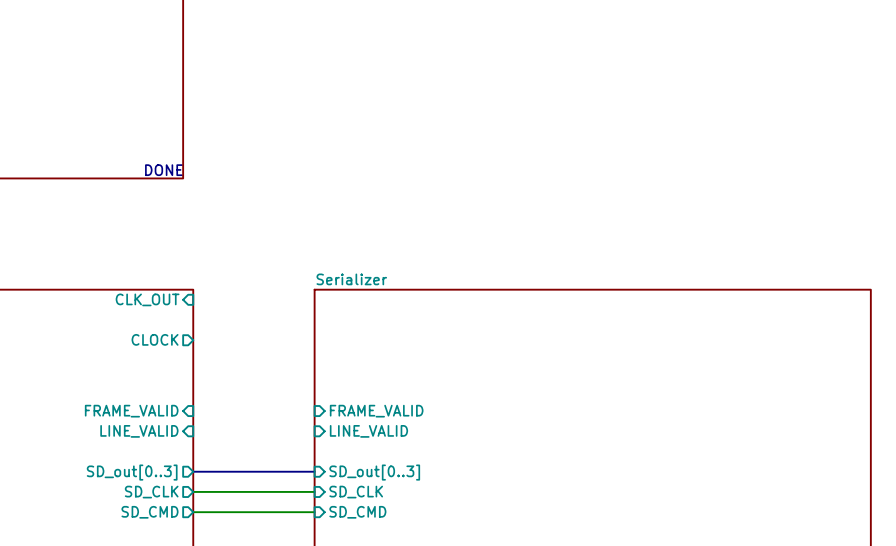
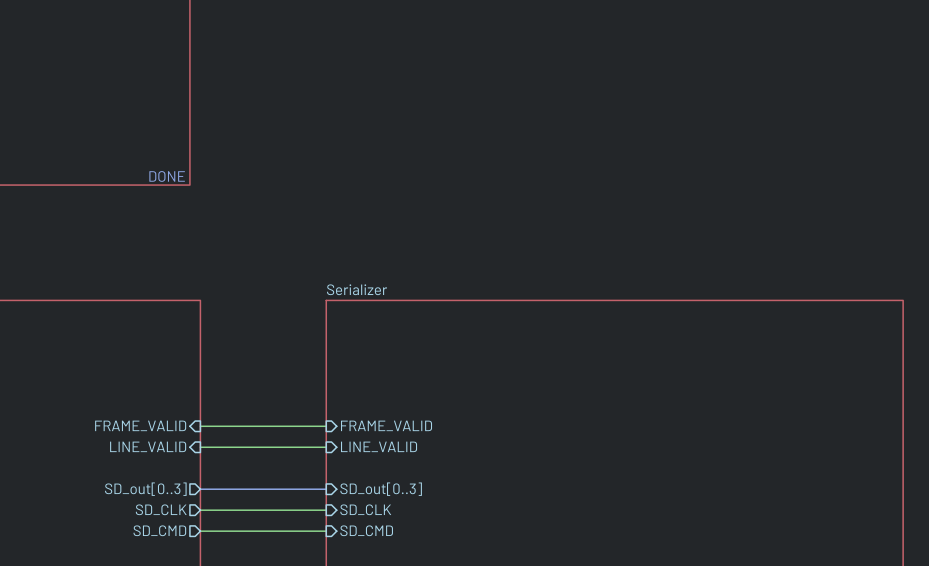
sheet pin: CLK_OUT (147, 299) -> none
sheet pin: CLOCK (155, 339) -> none
wire: none -> (200, 426) (326, 426)
wire: none -> (200, 447) (326, 447)

